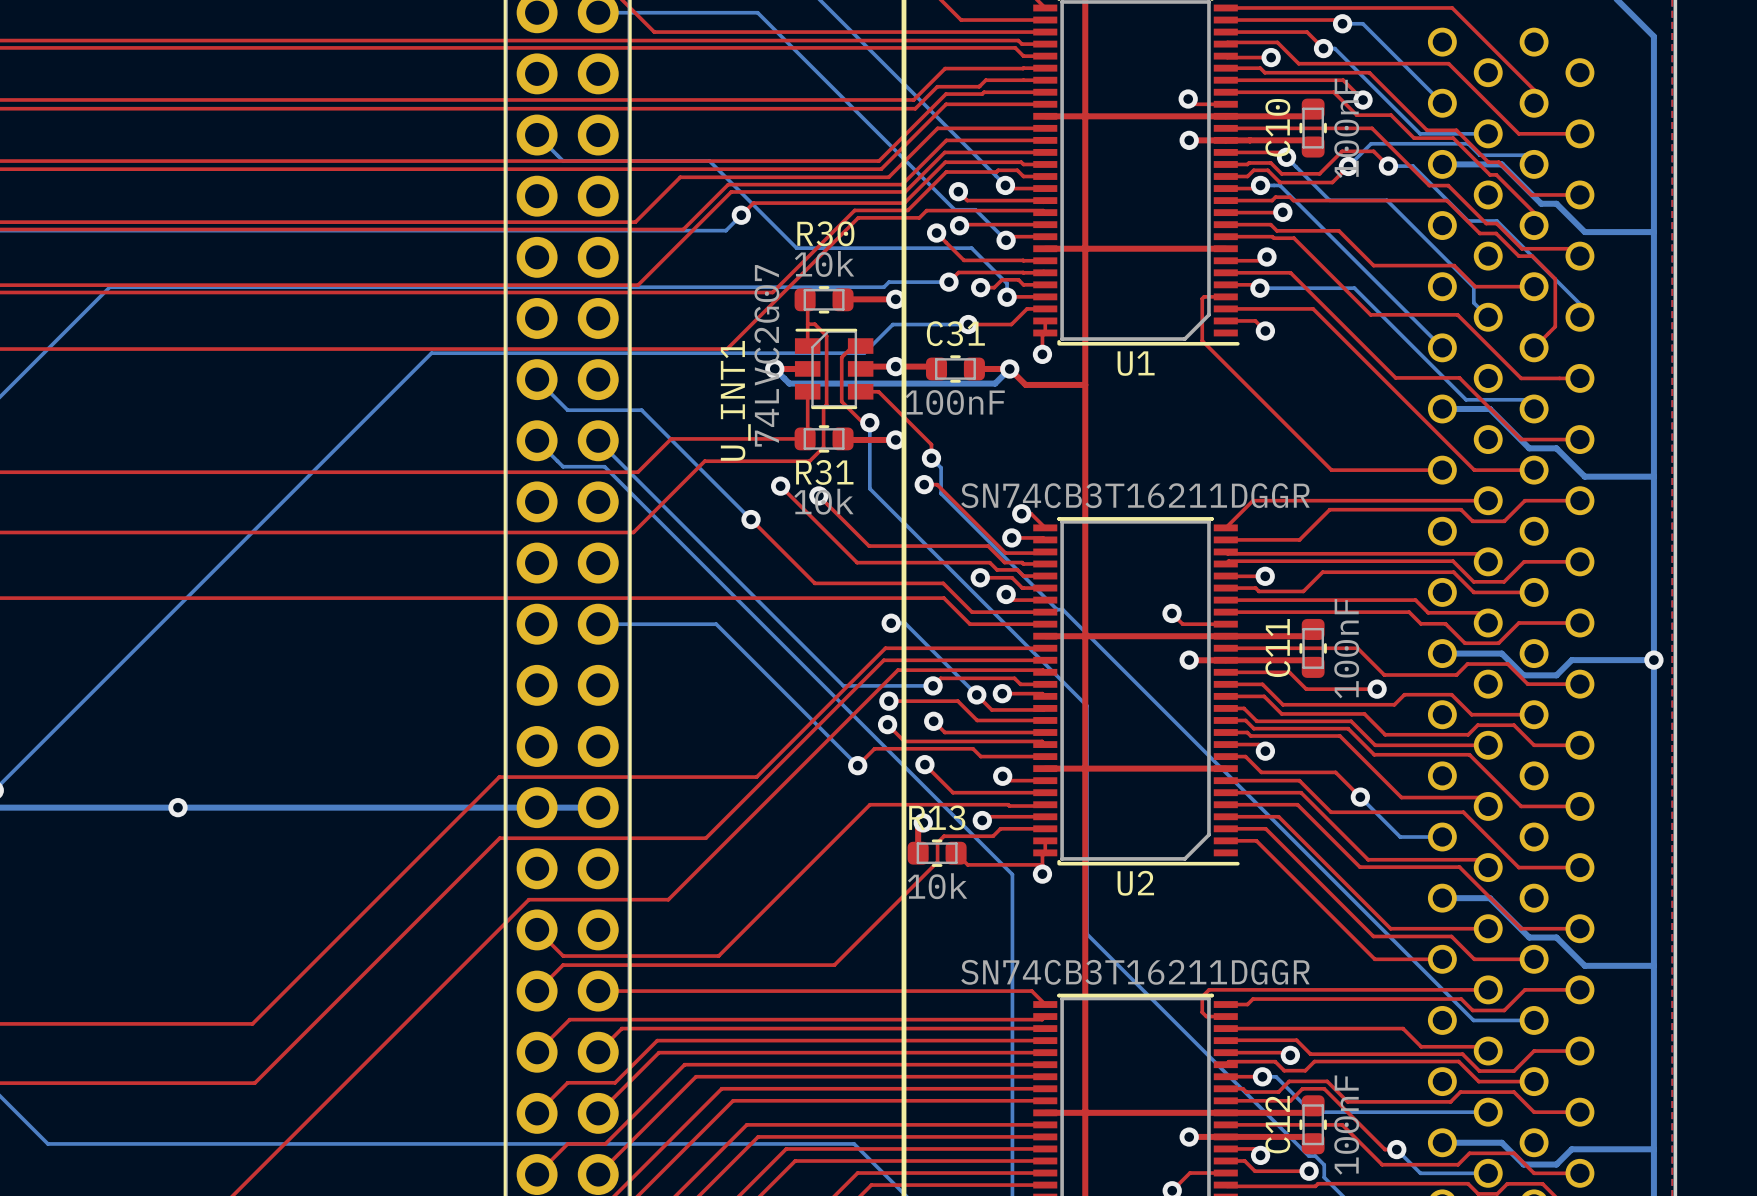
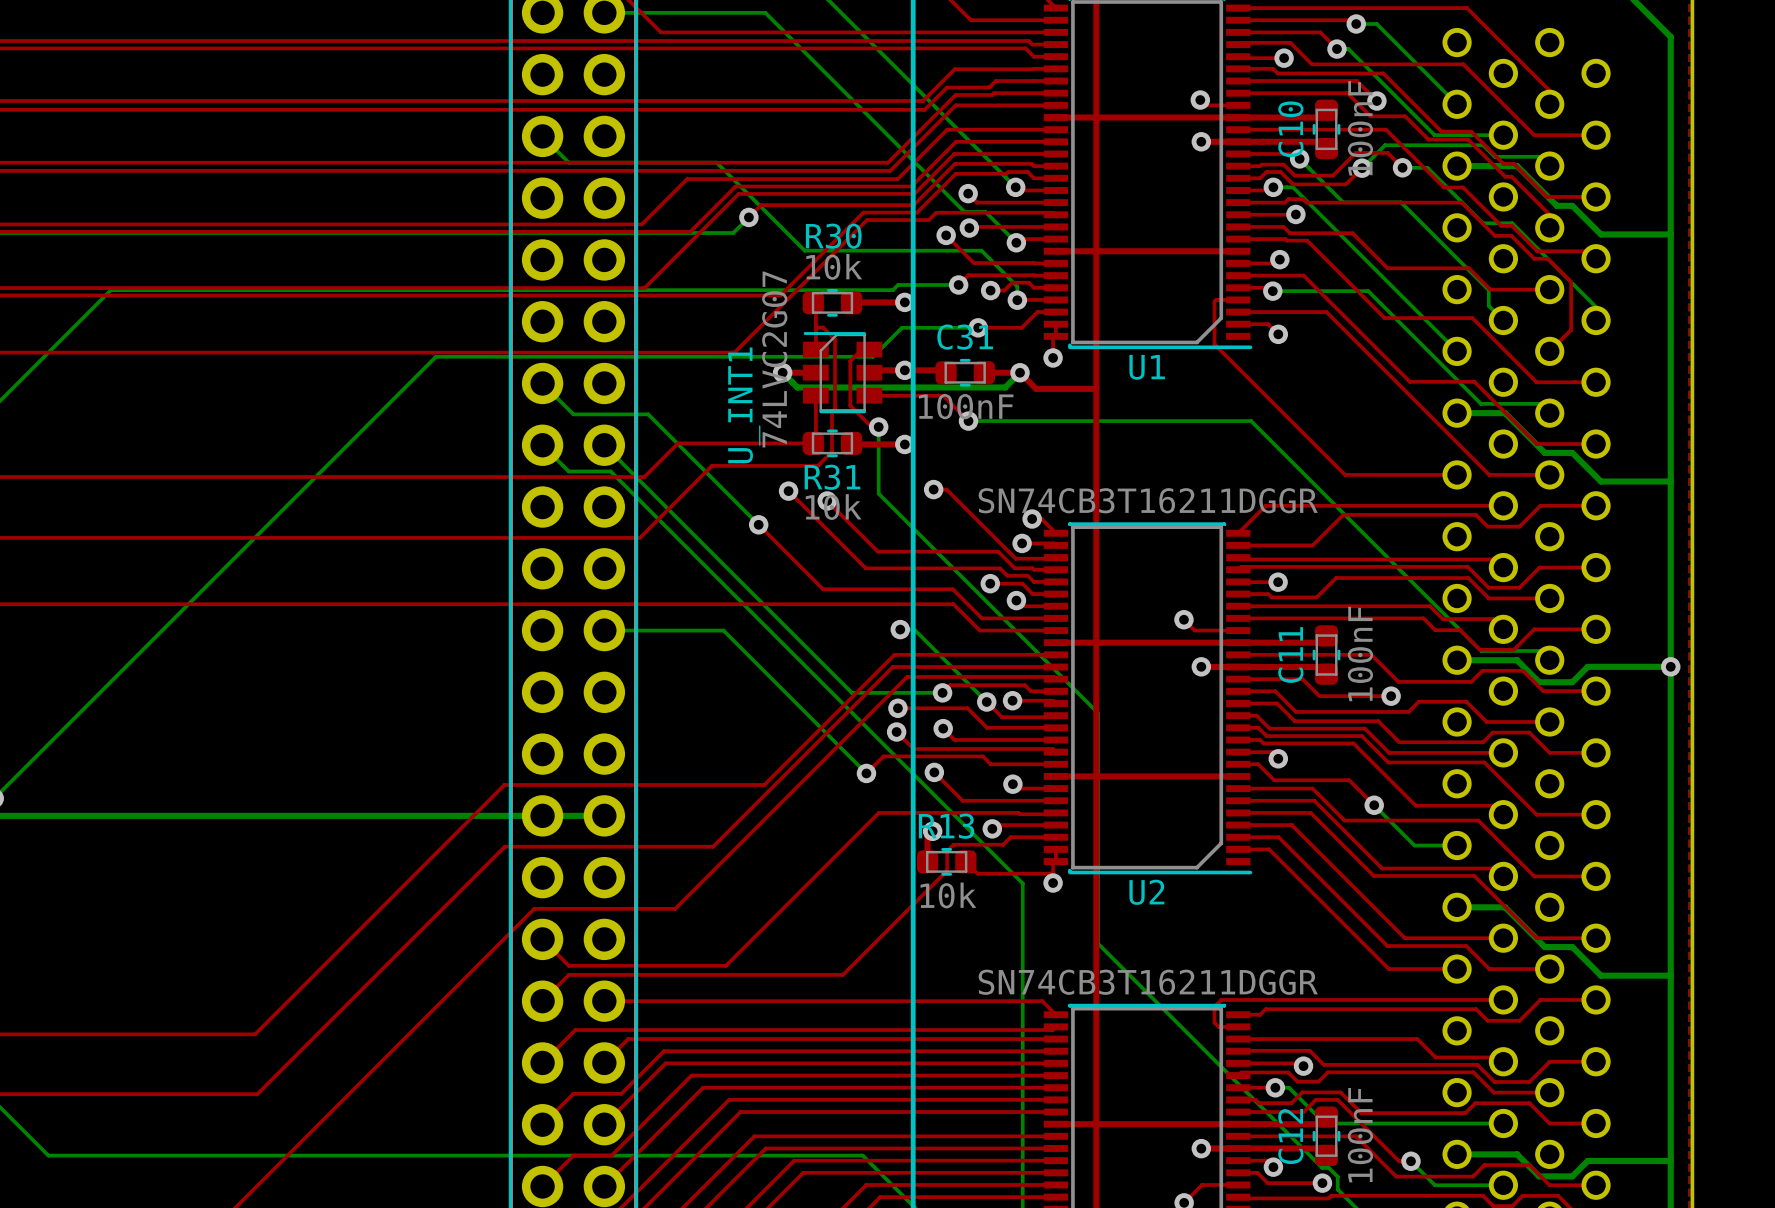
top track: (878, 391) (931, 444) (931, 458) -> (887, 395) (943, 395) (968, 421)
bottom track: none -> (968, 421) (1251, 421) (1481, 650) (1540, 650) (1549, 660)
bottom track: (931, 458) (941, 467) (941, 493) (1057, 609) (1062, 609) (1473, 1020) (1534, 1020) -> none
via position: (931, 458) -> (968, 421)
via: (177, 807) -> none

